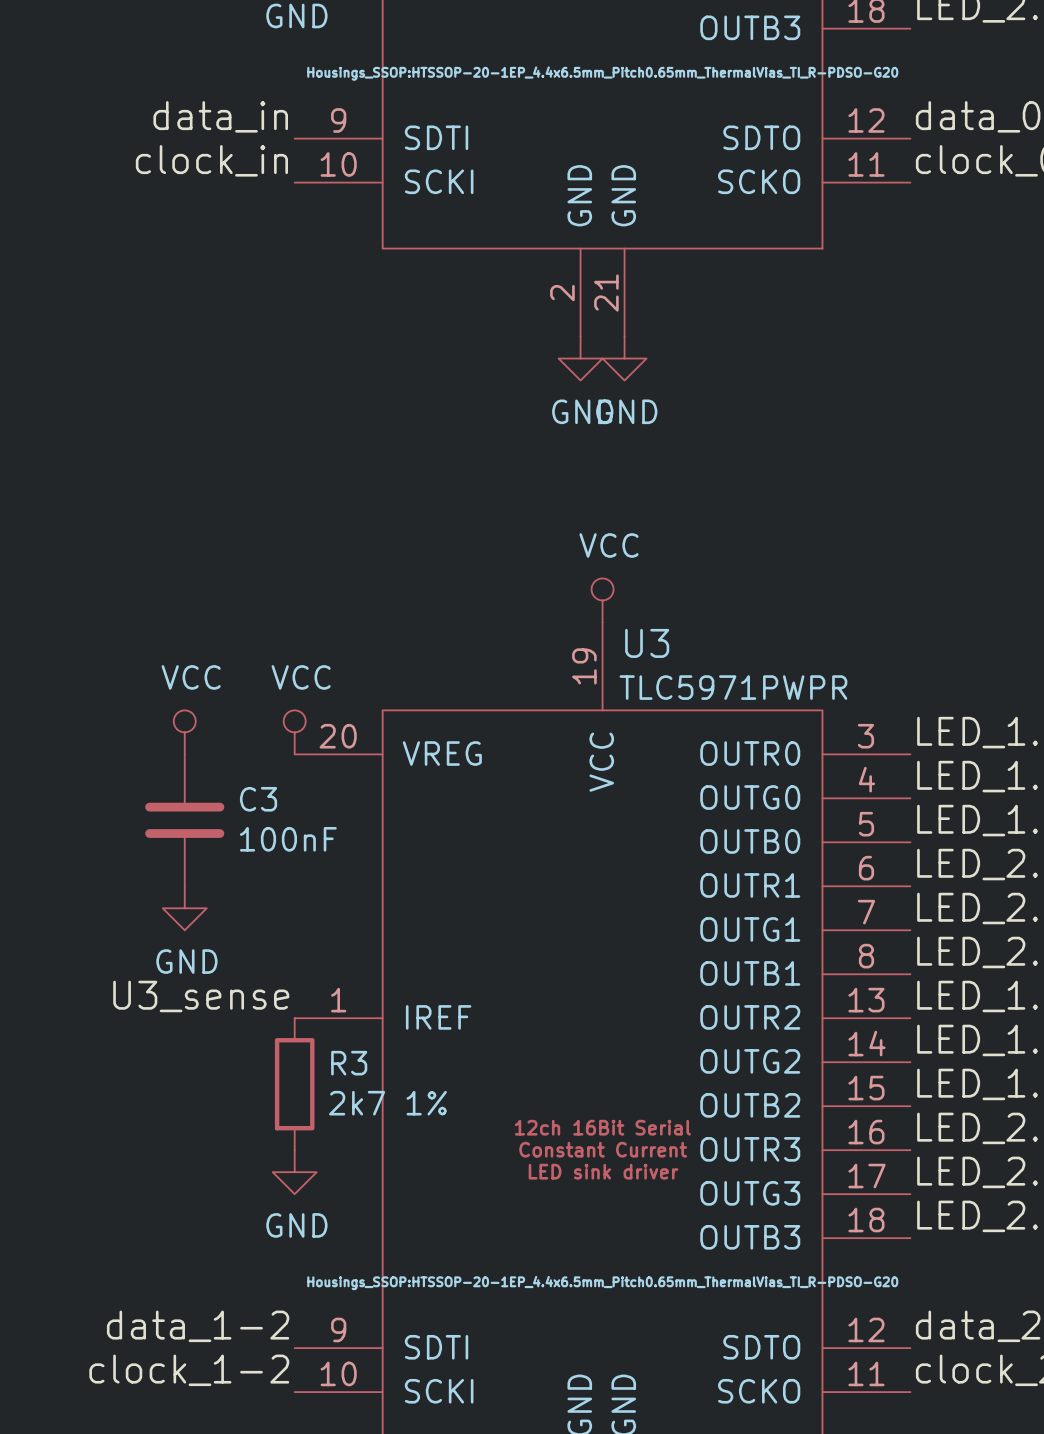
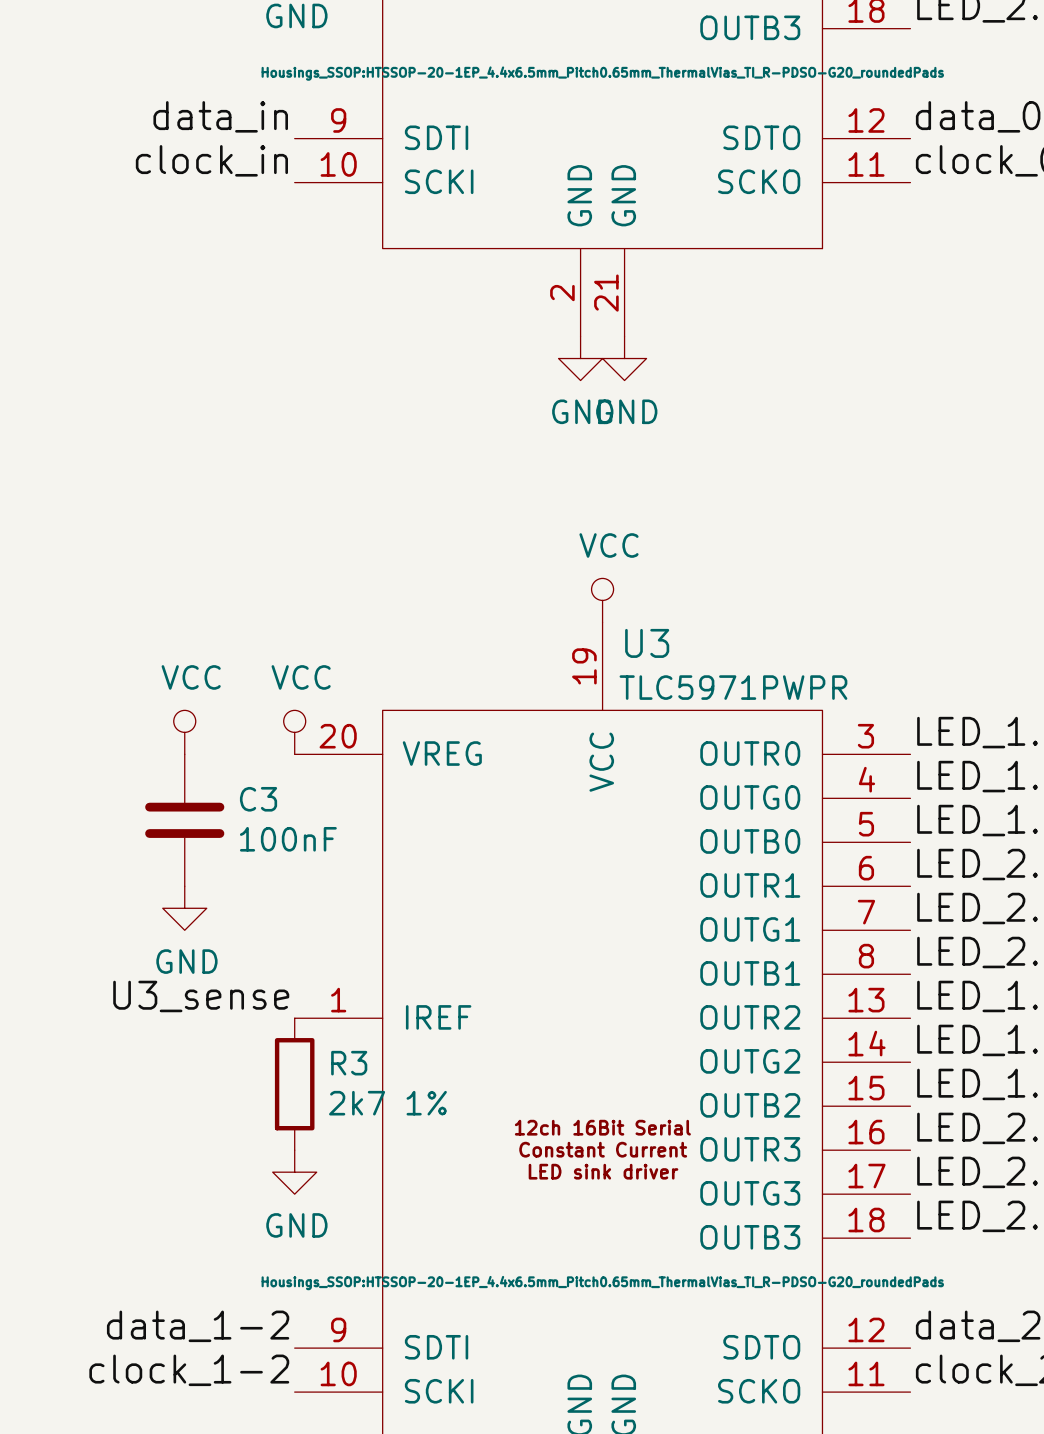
part text: Housings_SSOP:HTSSOP-20-1EP_4.4x6.5mm_Pitch0.65mm_ThermalVias_TI_R-PDSO-G20 (602, 73) -> Housings_SSOP:HTSSOP-20-1EP_4.4x6.5mm_Pitch0.65mm_ThermalVias_TI_R-PDSO-G20_roundedPads (602, 73)
U3 text: Housings_SSOP:HTSSOP-20-1EP_4.4x6.5mm_Pitch0.65mm_ThermalVias_TI_R-PDSO-G20 (602, 1283) -> Housings_SSOP:HTSSOP-20-1EP_4.4x6.5mm_Pitch0.65mm_ThermalVias_TI_R-PDSO-G20_roundedPads (602, 1283)

